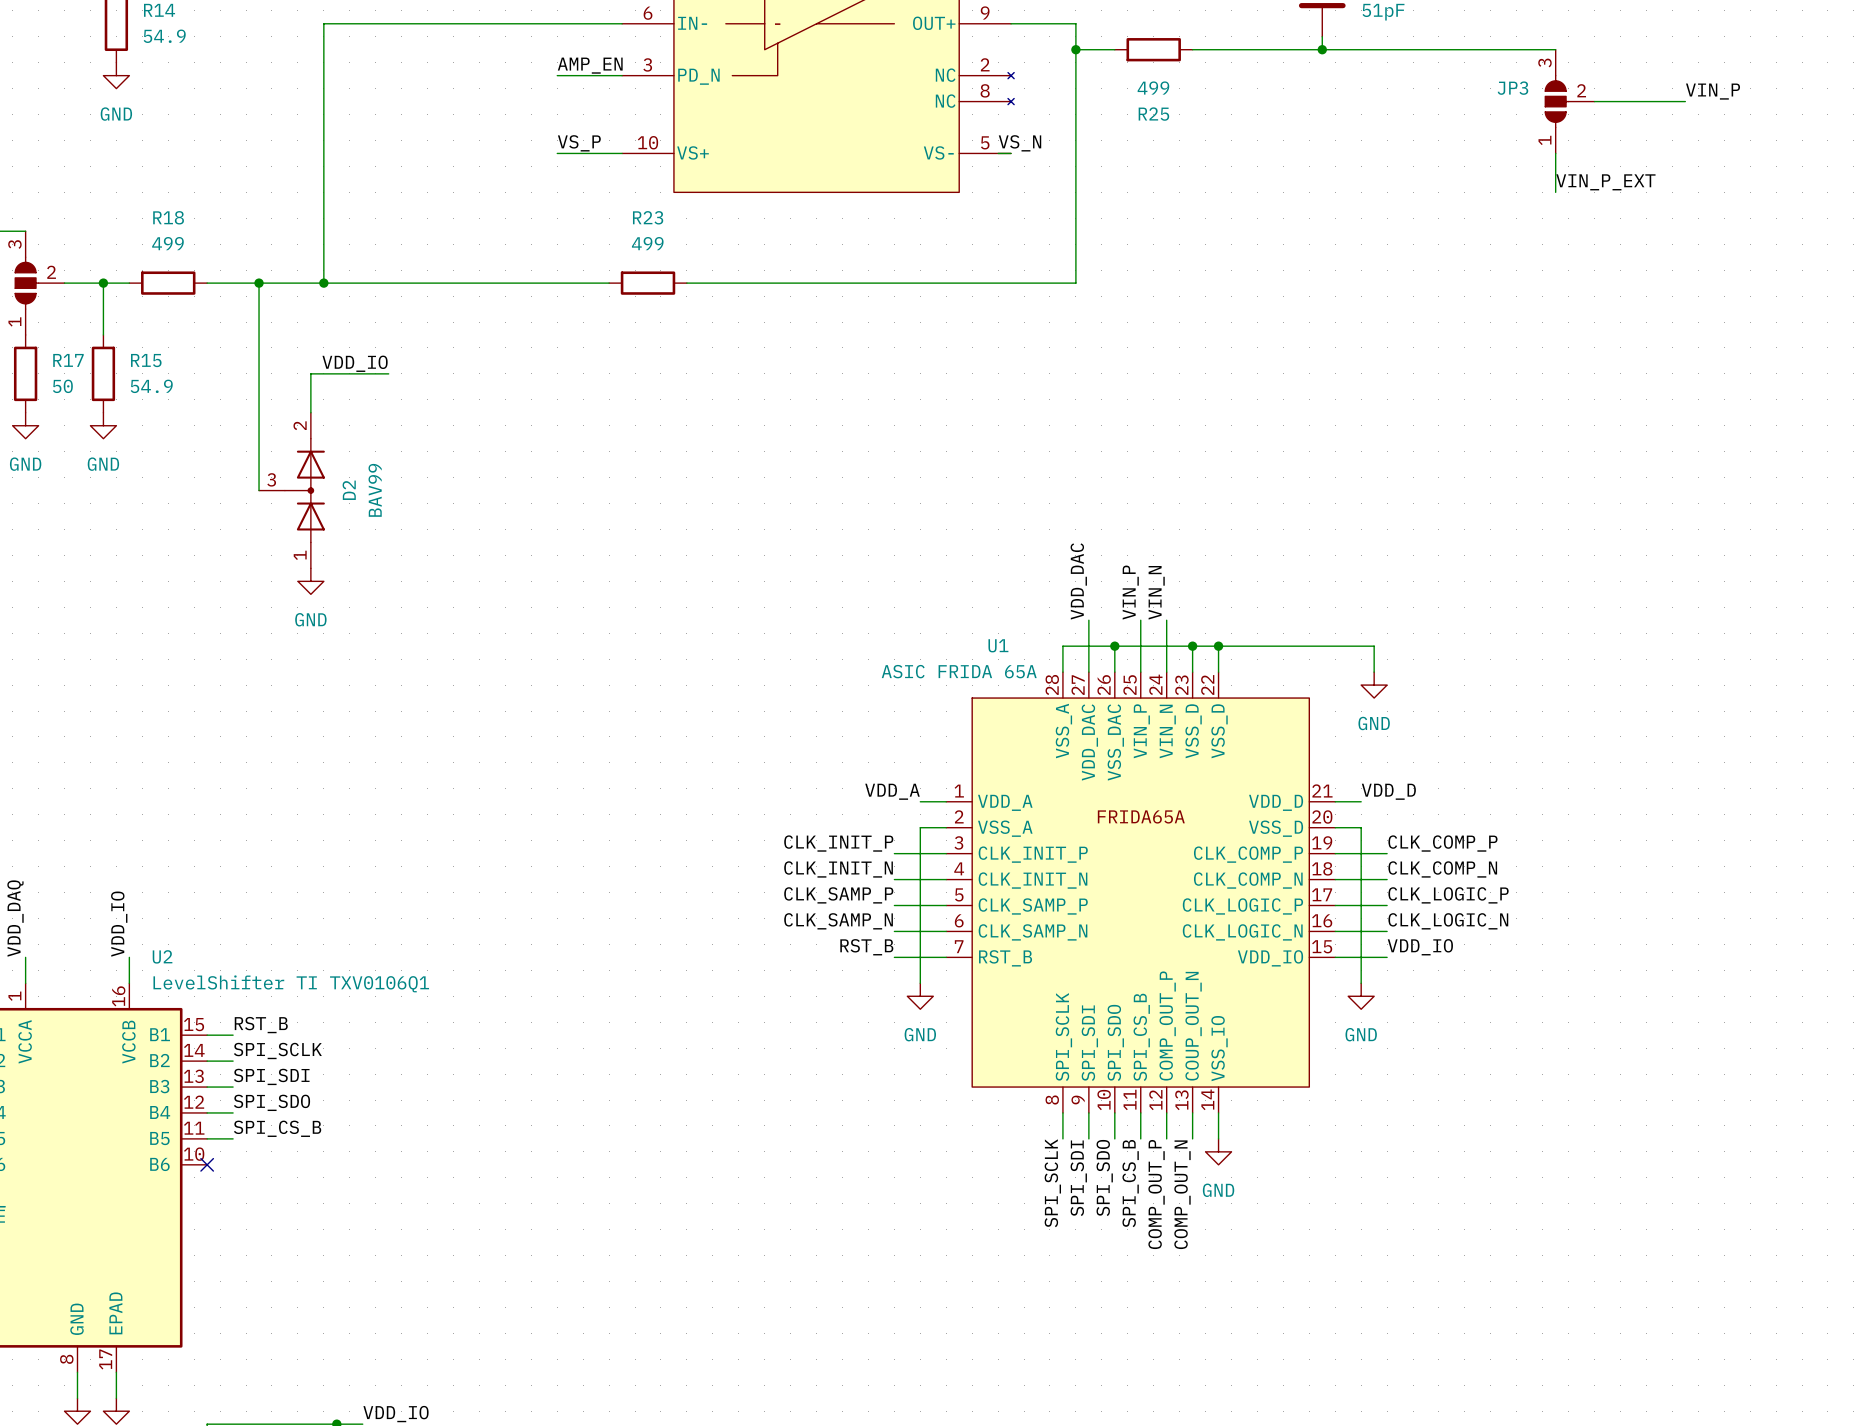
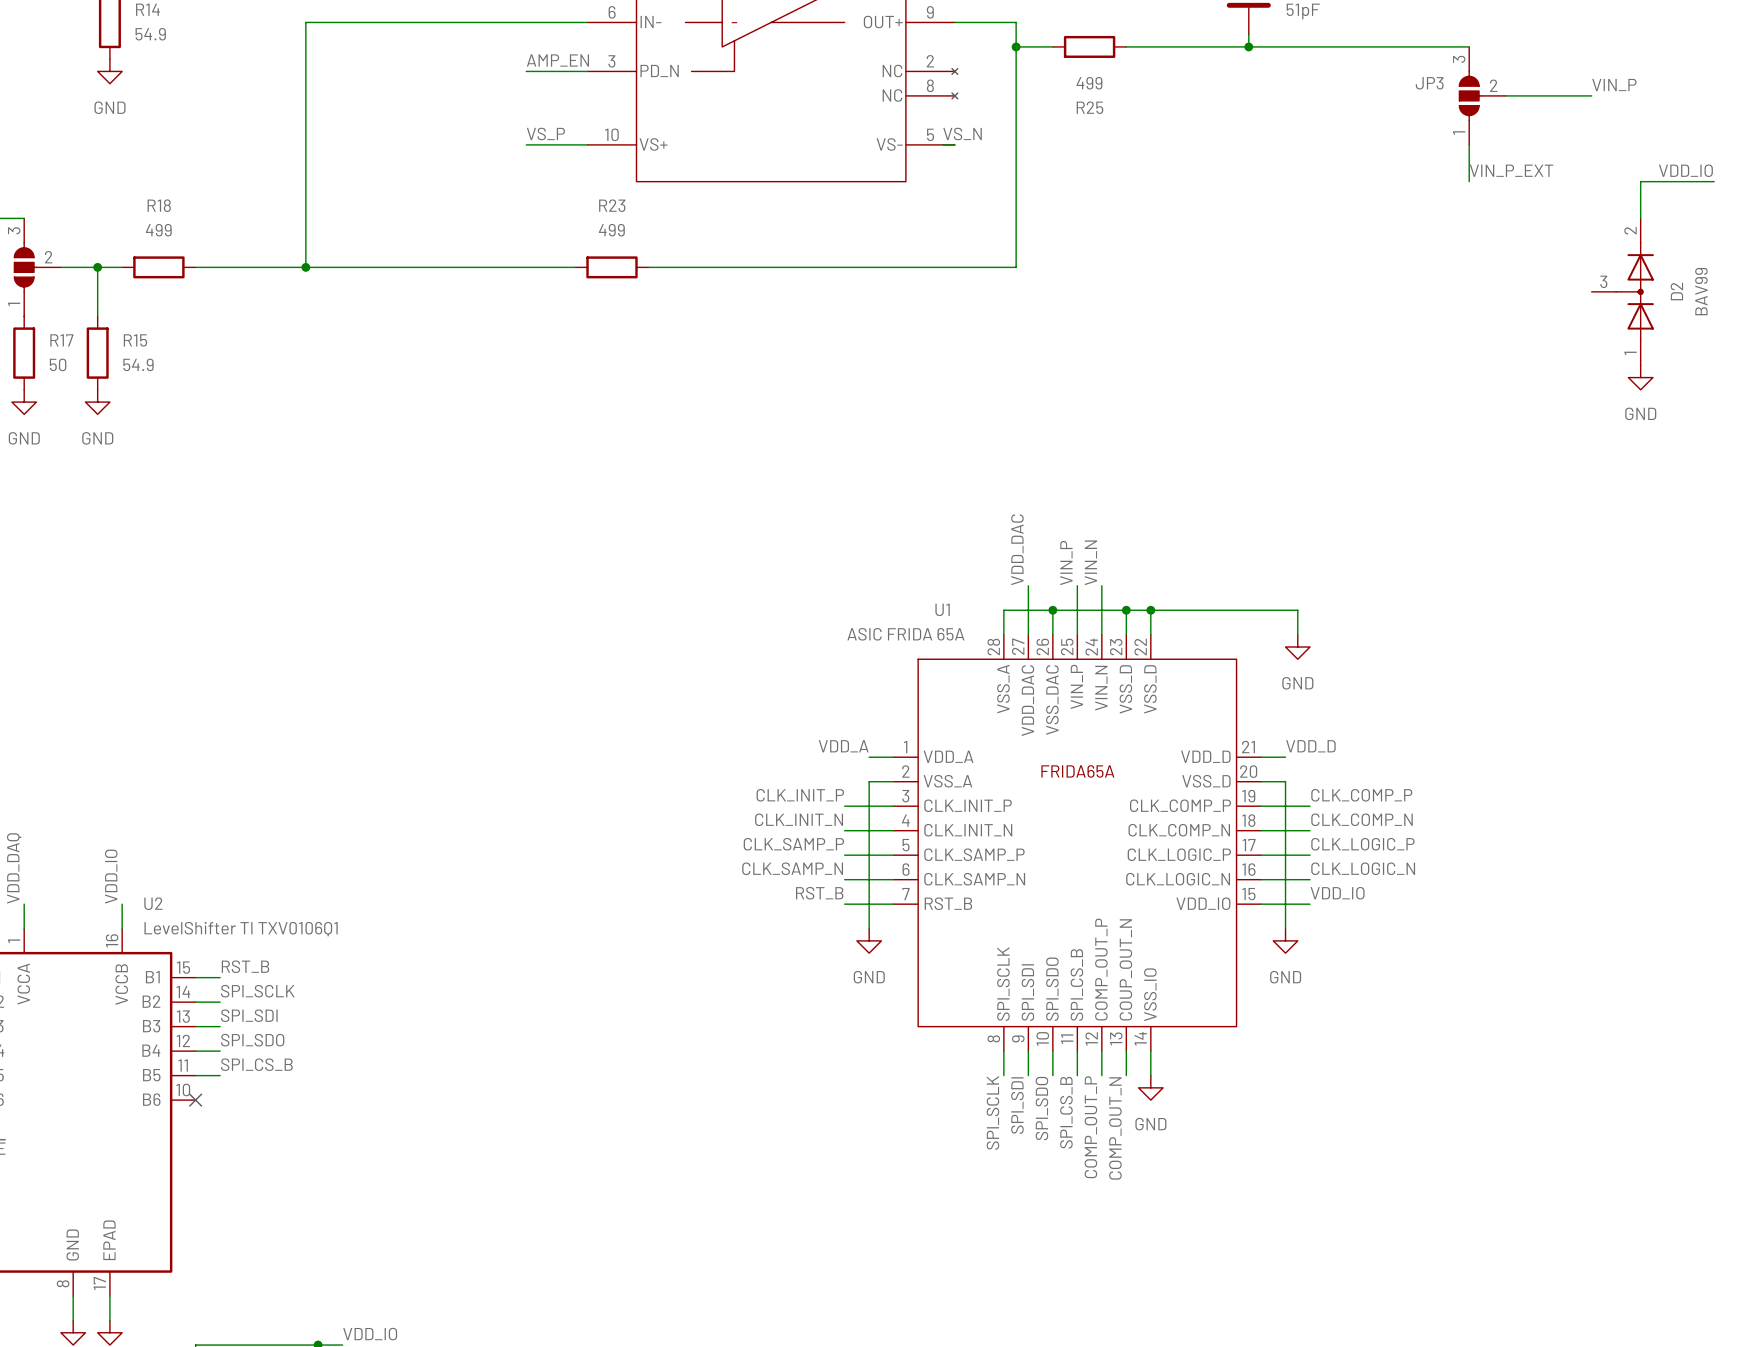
label: none -> VDD_IO (1685, 170)
wire: none -> (1714, 181) (1640, 181) (1640, 218)
wire: (259, 283) (259, 490) -> none
junction: (259, 283) -> none
label: VDD_IO (355, 363) -> none
wire: (388, 373) (310, 373) (310, 412) -> none
power symbol: none -> GND (1640, 377)
D2 position: (291, 490) -> (1622, 291)
power symbol: GND (310, 581) -> none

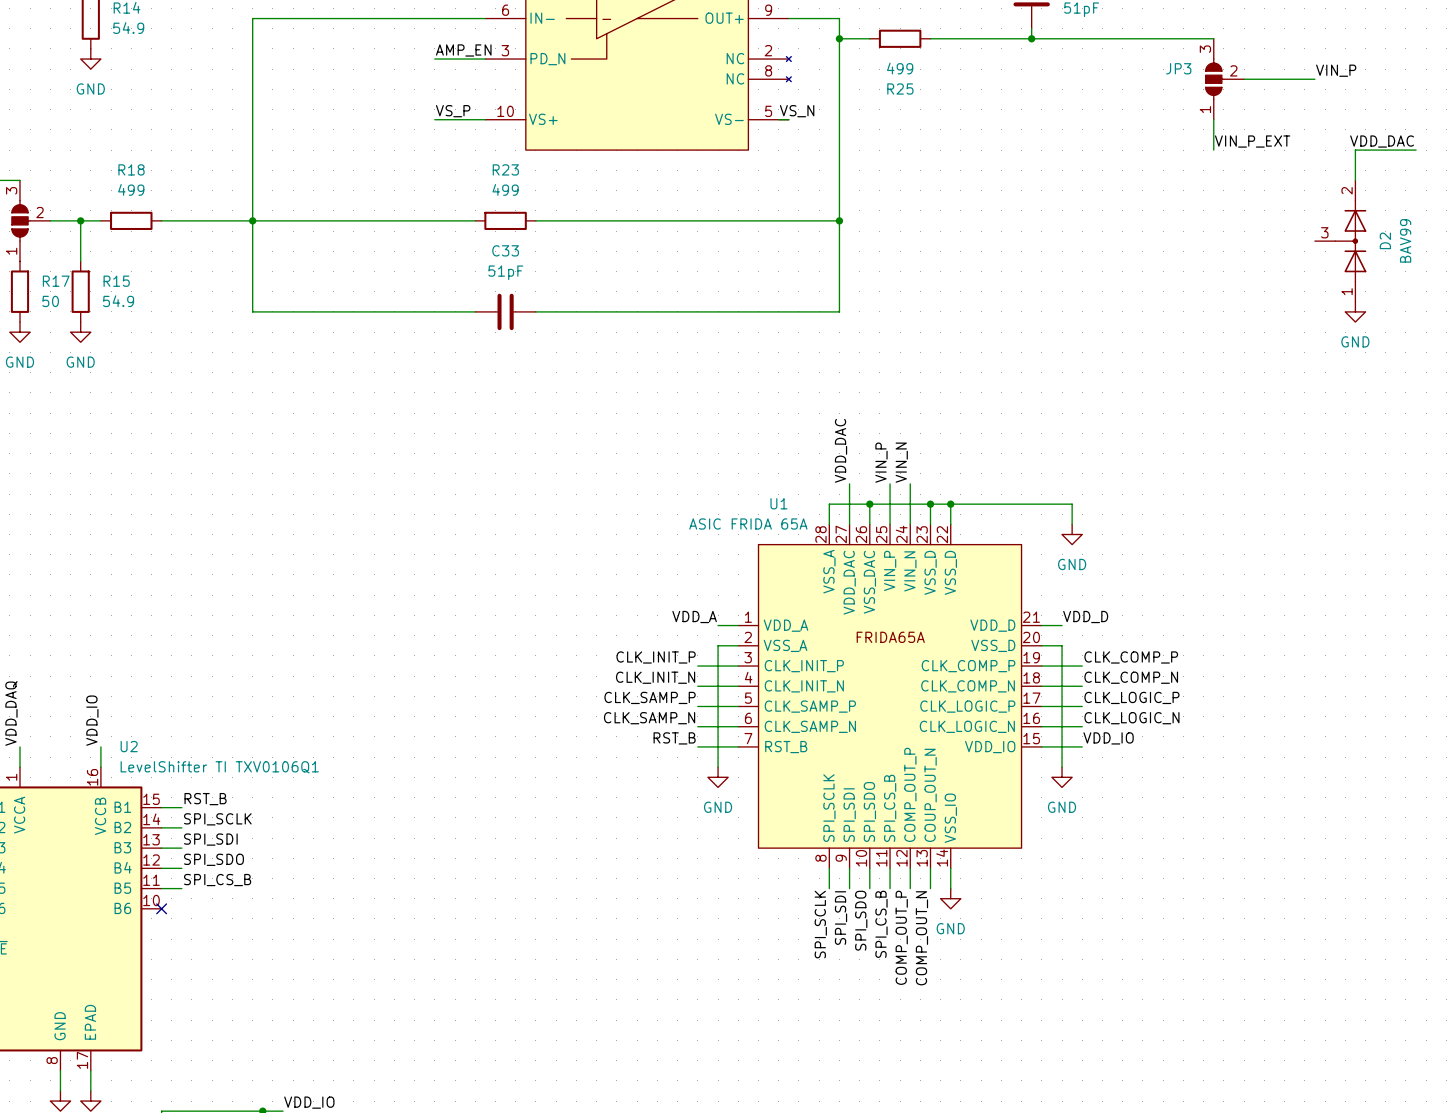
label: VDD_IO (1685, 170) -> VDD_DAC (1382, 141)
wire: none -> (252, 220) (252, 311) (475, 311)
wire: none -> (839, 220) (839, 311) (535, 311)
junction: none -> (839, 220)
C33: none -> 51pF (505, 311)

